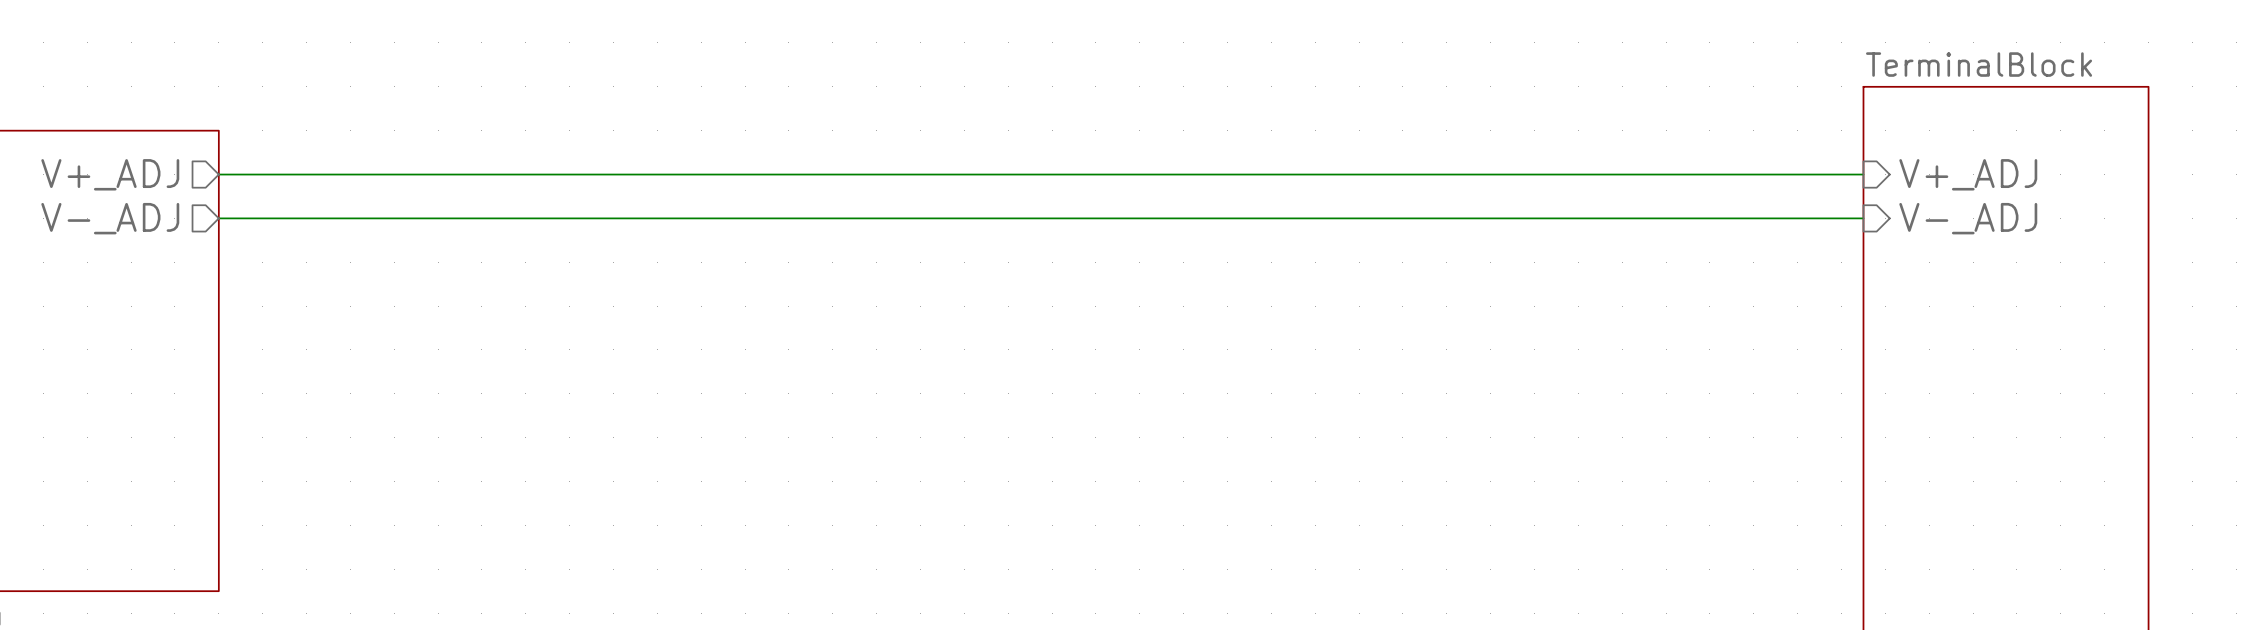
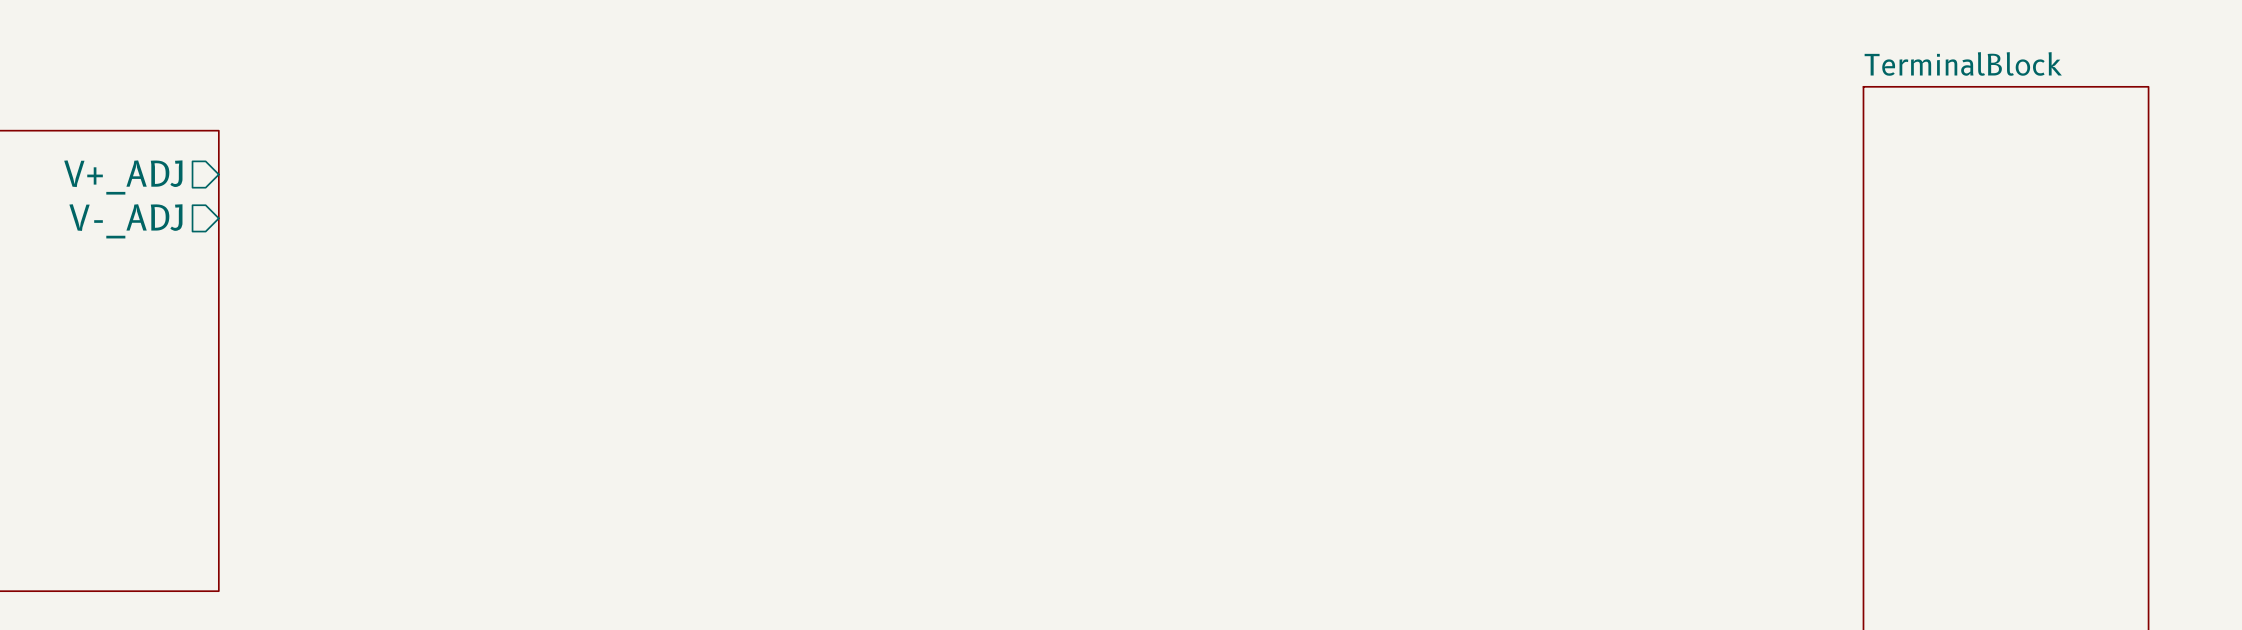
wire: (218, 174) (1863, 174) -> none
sheet pin: V+_ADJ (1968, 174) -> none
wire: (218, 218) (1863, 218) -> none
sheet pin: V-_ADJ (1968, 218) -> none

